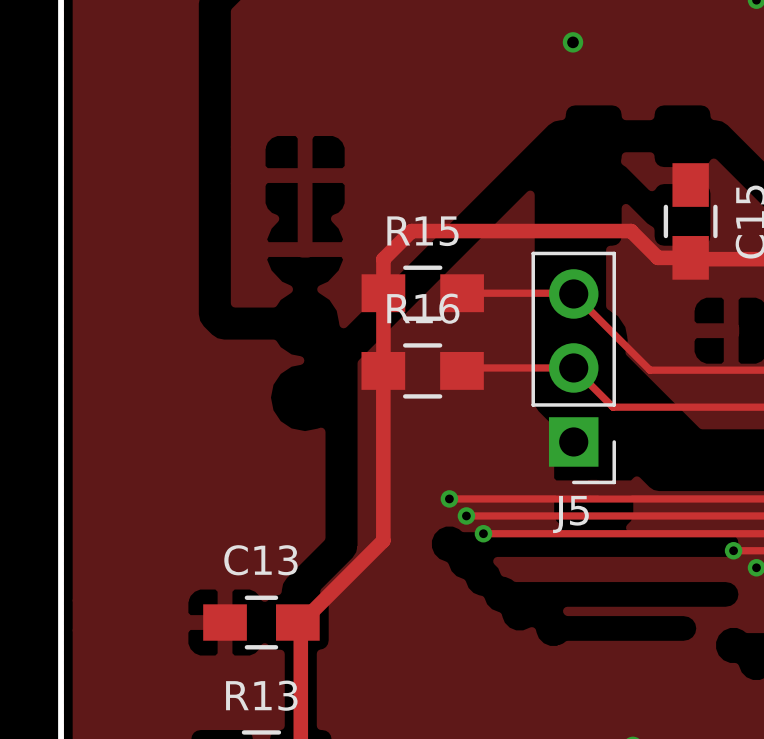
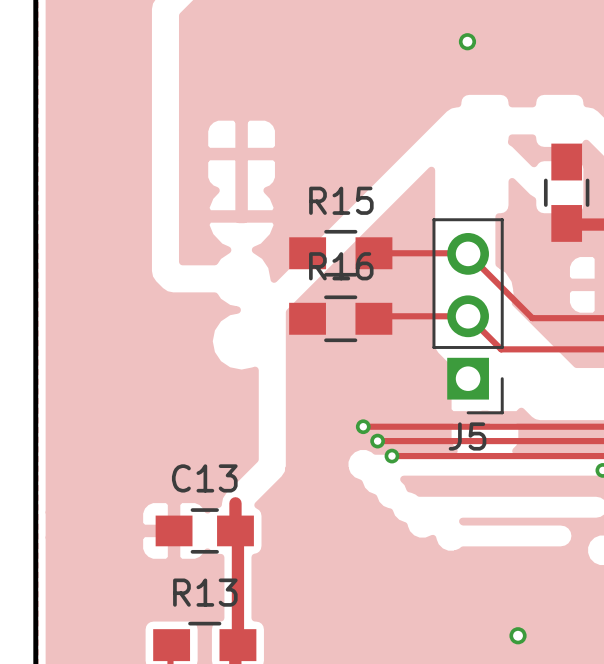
track: (690, 257) (657, 257) (631, 231) (411, 231) (383, 259) (383, 540) (301, 622) (297, 622) -> (235, 503) (235, 530)

